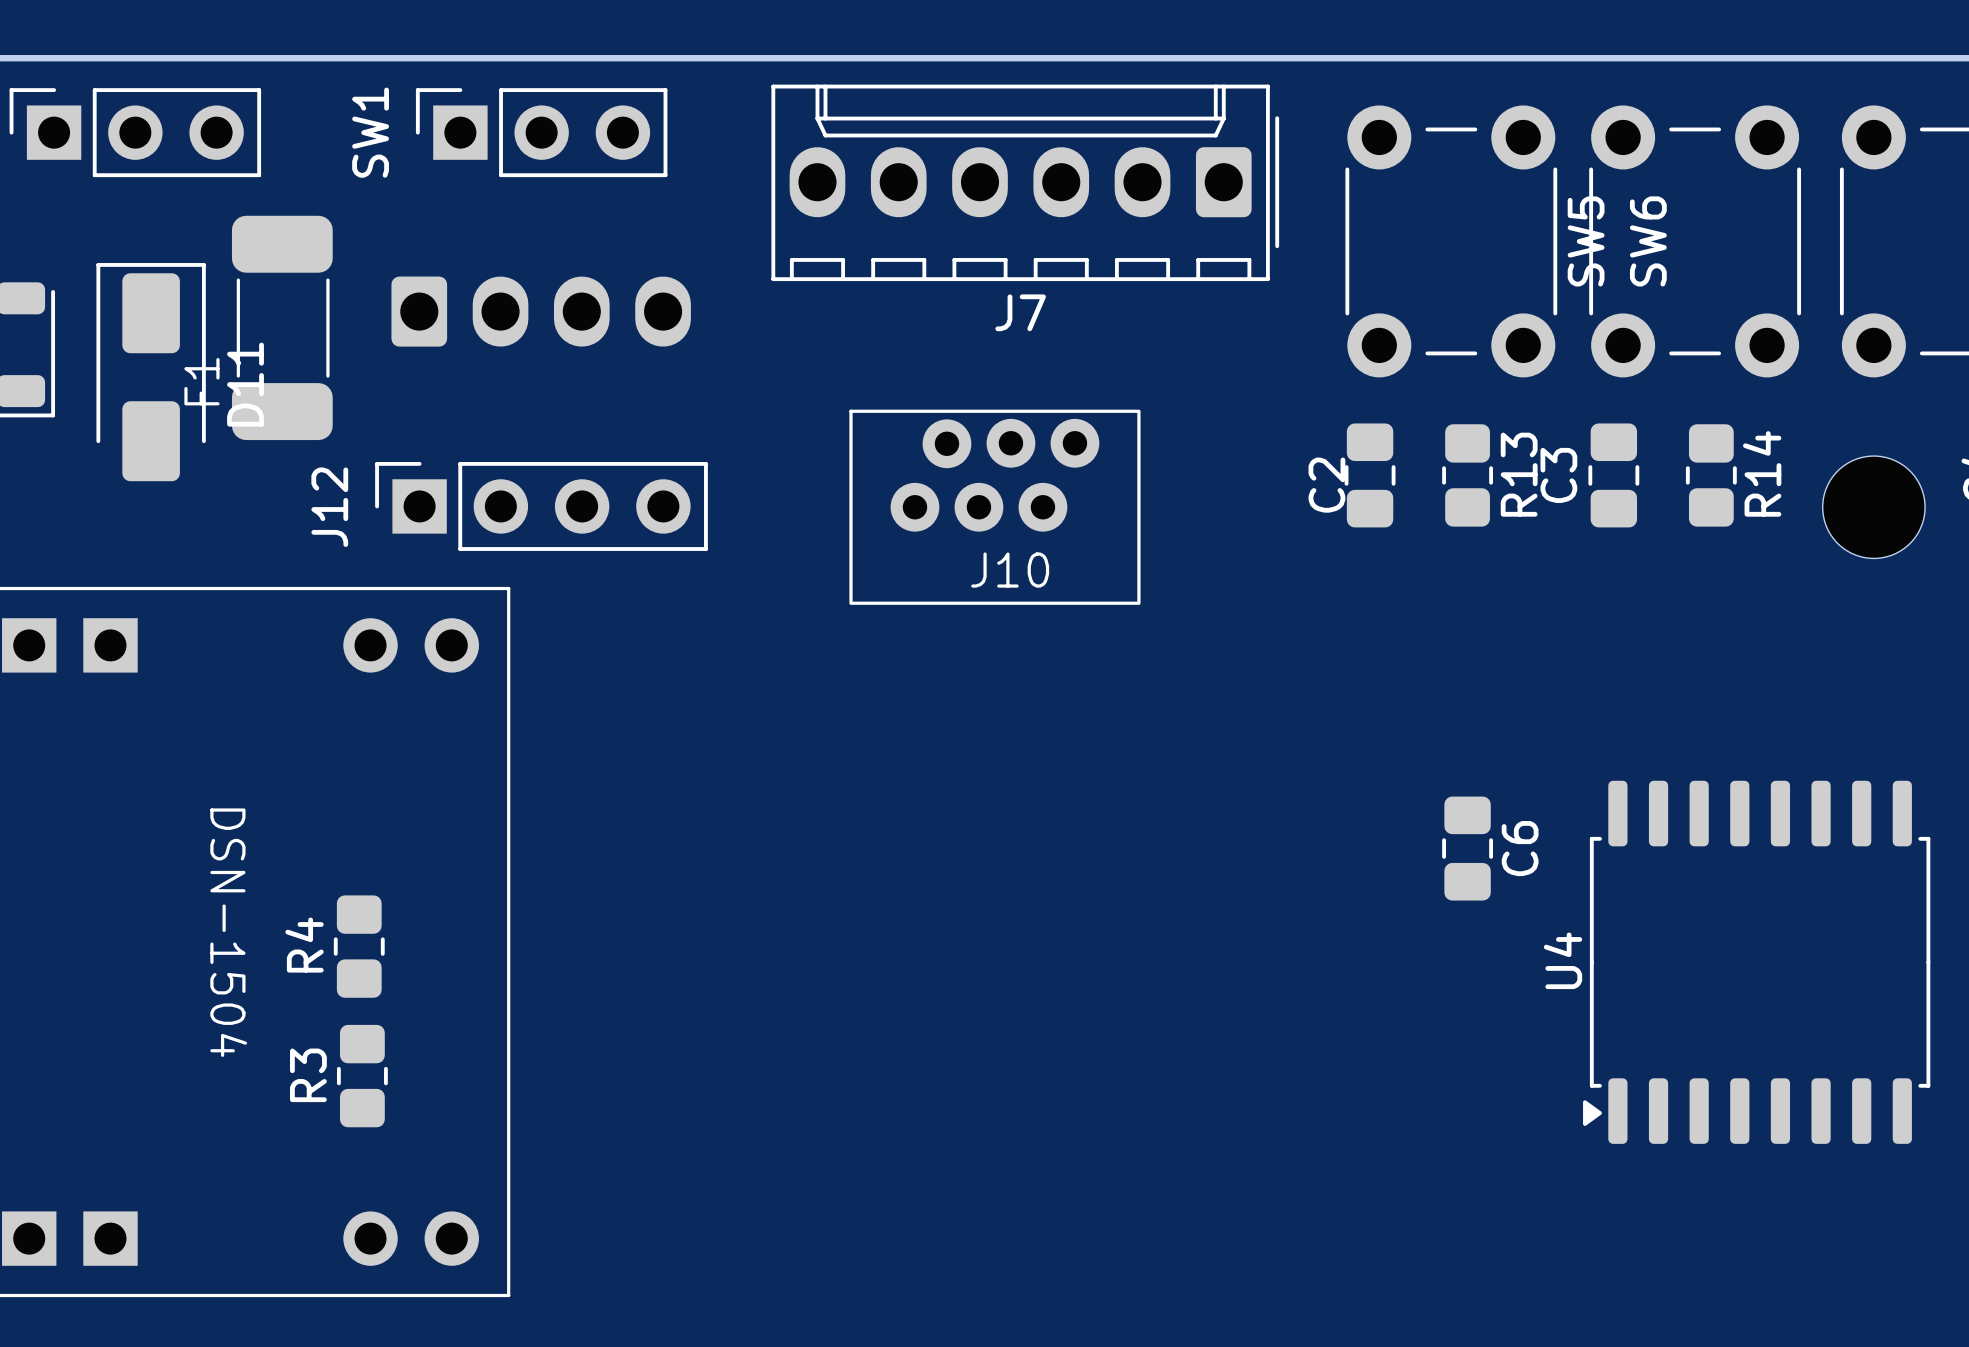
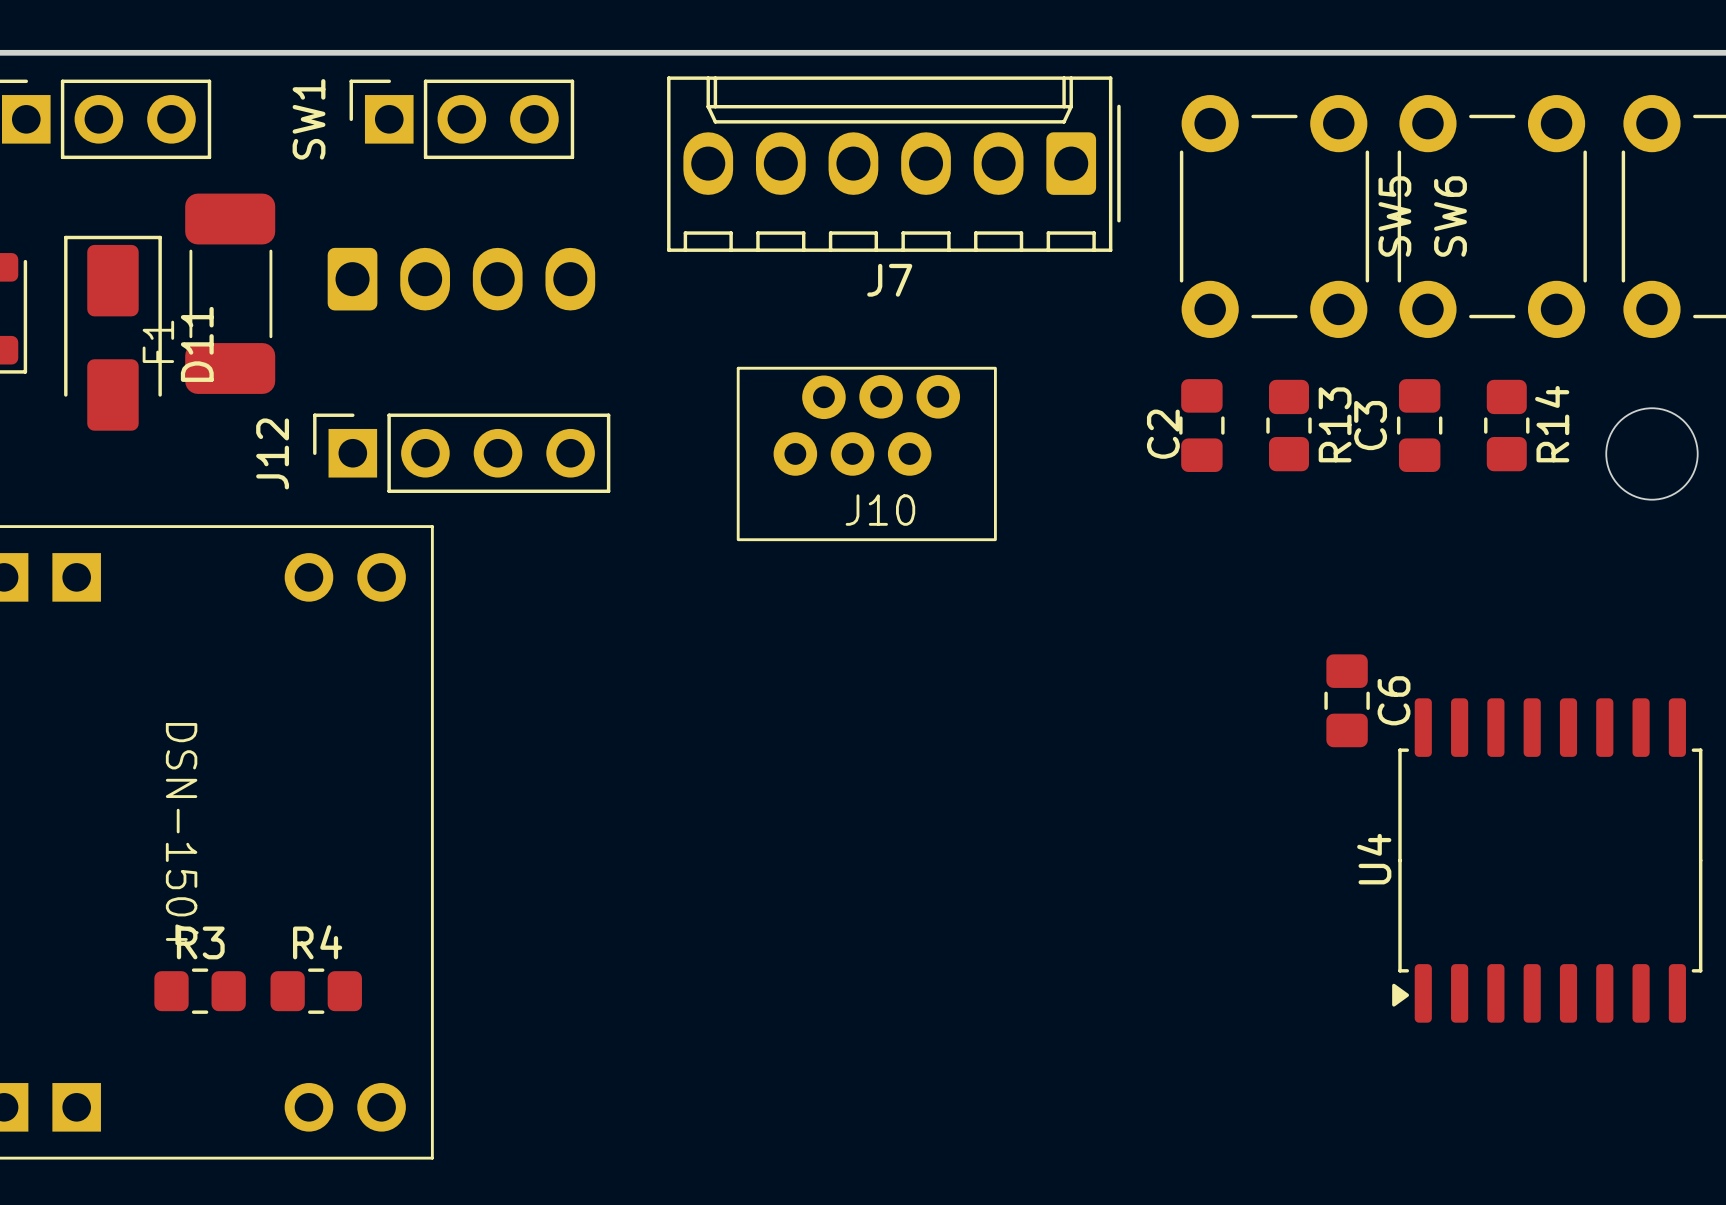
C6 position: (1467, 848) -> (1347, 700)
R4 rotation: 0° (359, 946) -> 90° clockwise (316, 991)
R4 position: (359, 946) -> (316, 991)
R3 rotation: 0° (362, 1076) -> 90° clockwise (200, 991)
R3 position: (362, 1076) -> (200, 991)

